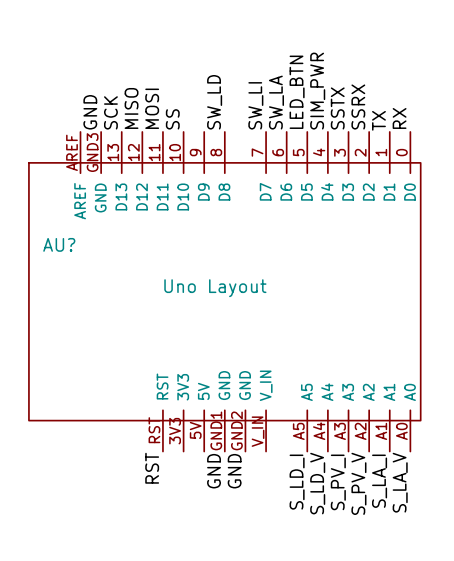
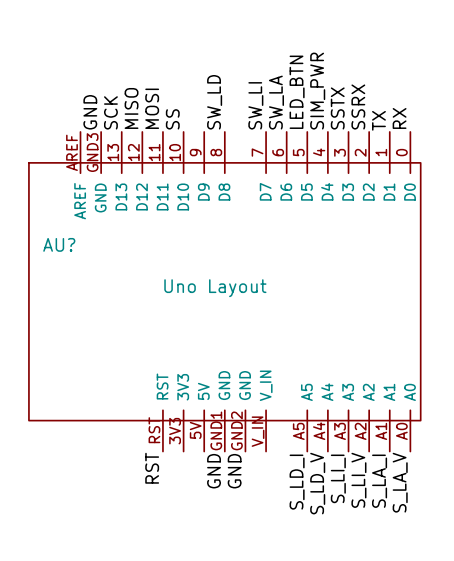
label: S_PV_I (338, 482) -> S_LI_I (338, 478)
label: S_PV_V (358, 483) -> S_LI_V (358, 480)

